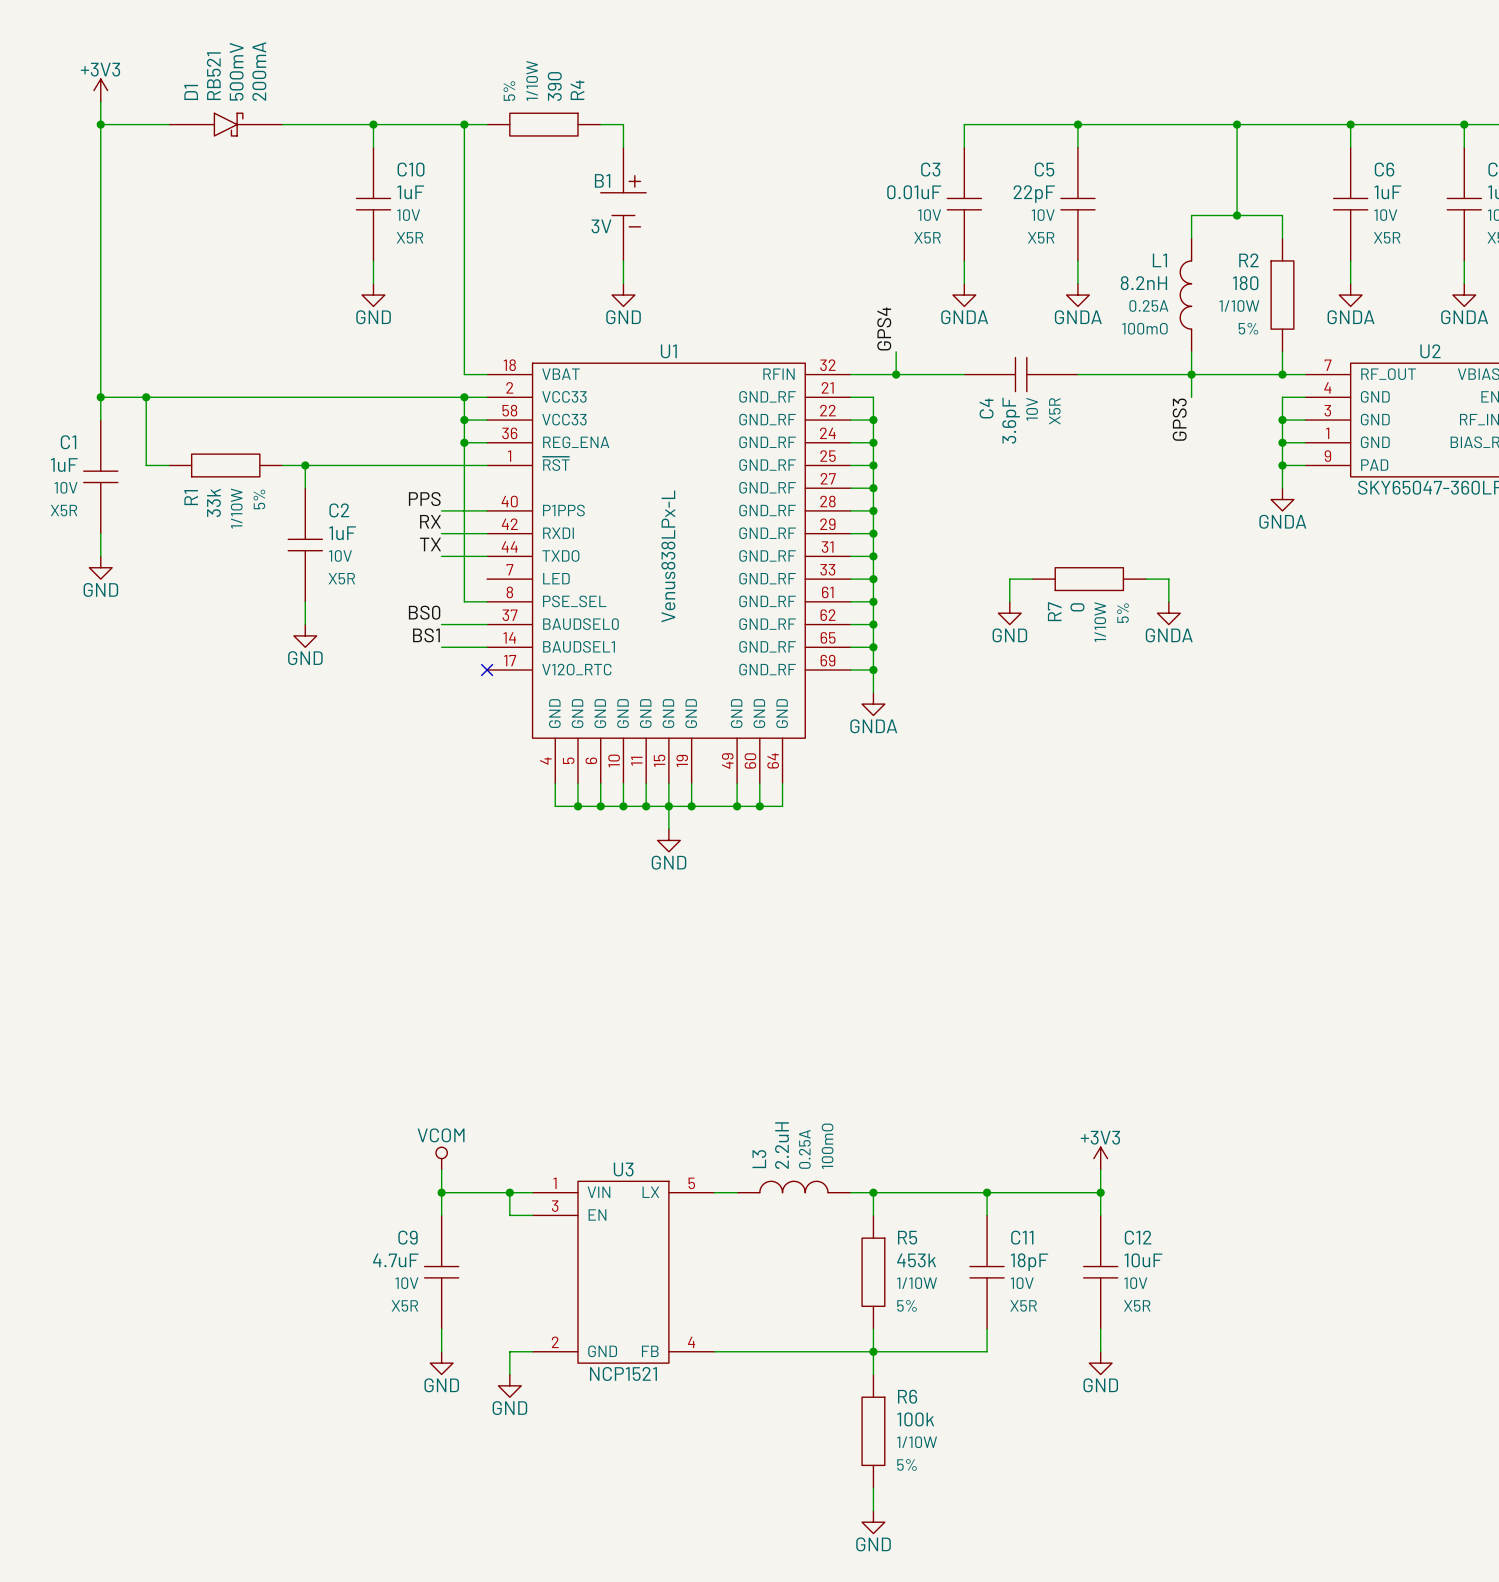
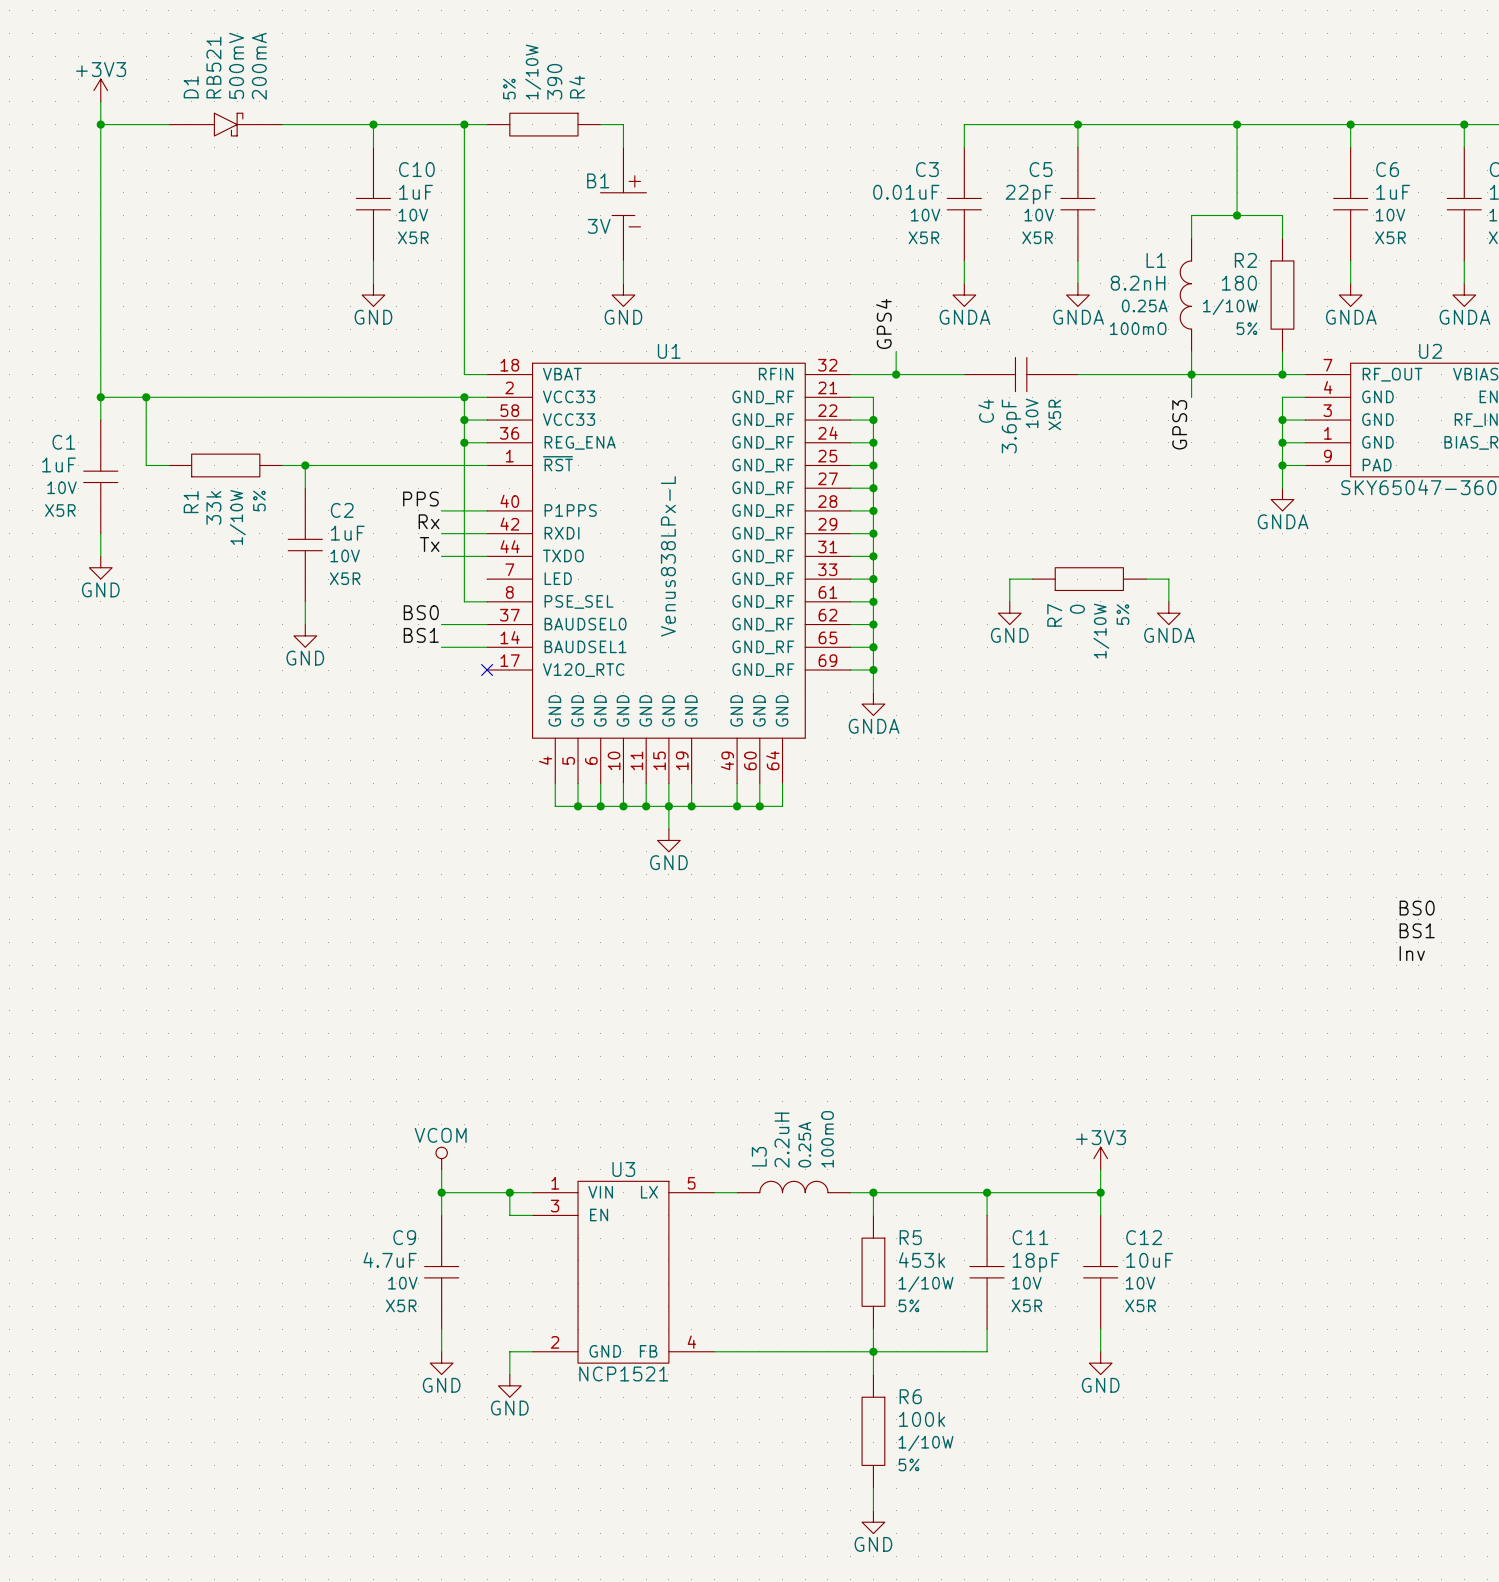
label: RX (430, 521) -> Rx (429, 521)
label: TX (430, 544) -> Tx (429, 544)
label: none -> BS0 (1417, 908)
label: none -> BS1 (1417, 930)
label: none -> Inv (1412, 953)

